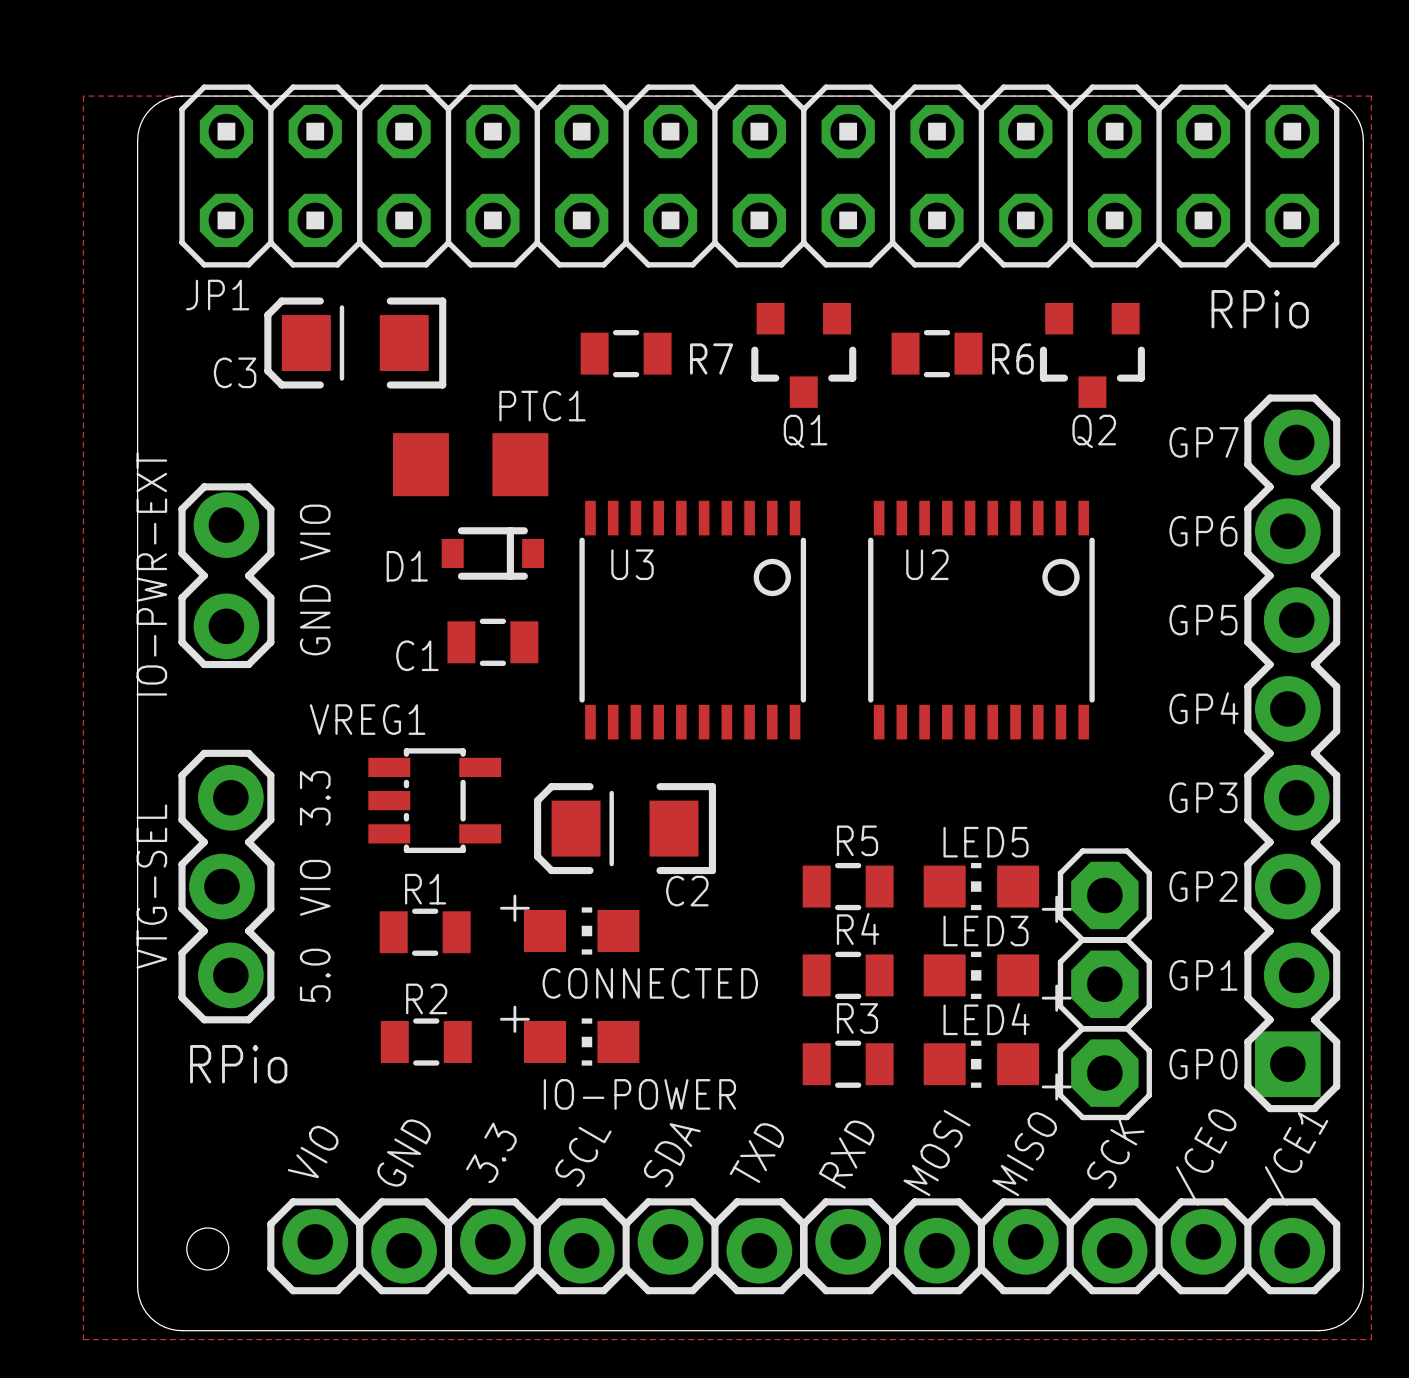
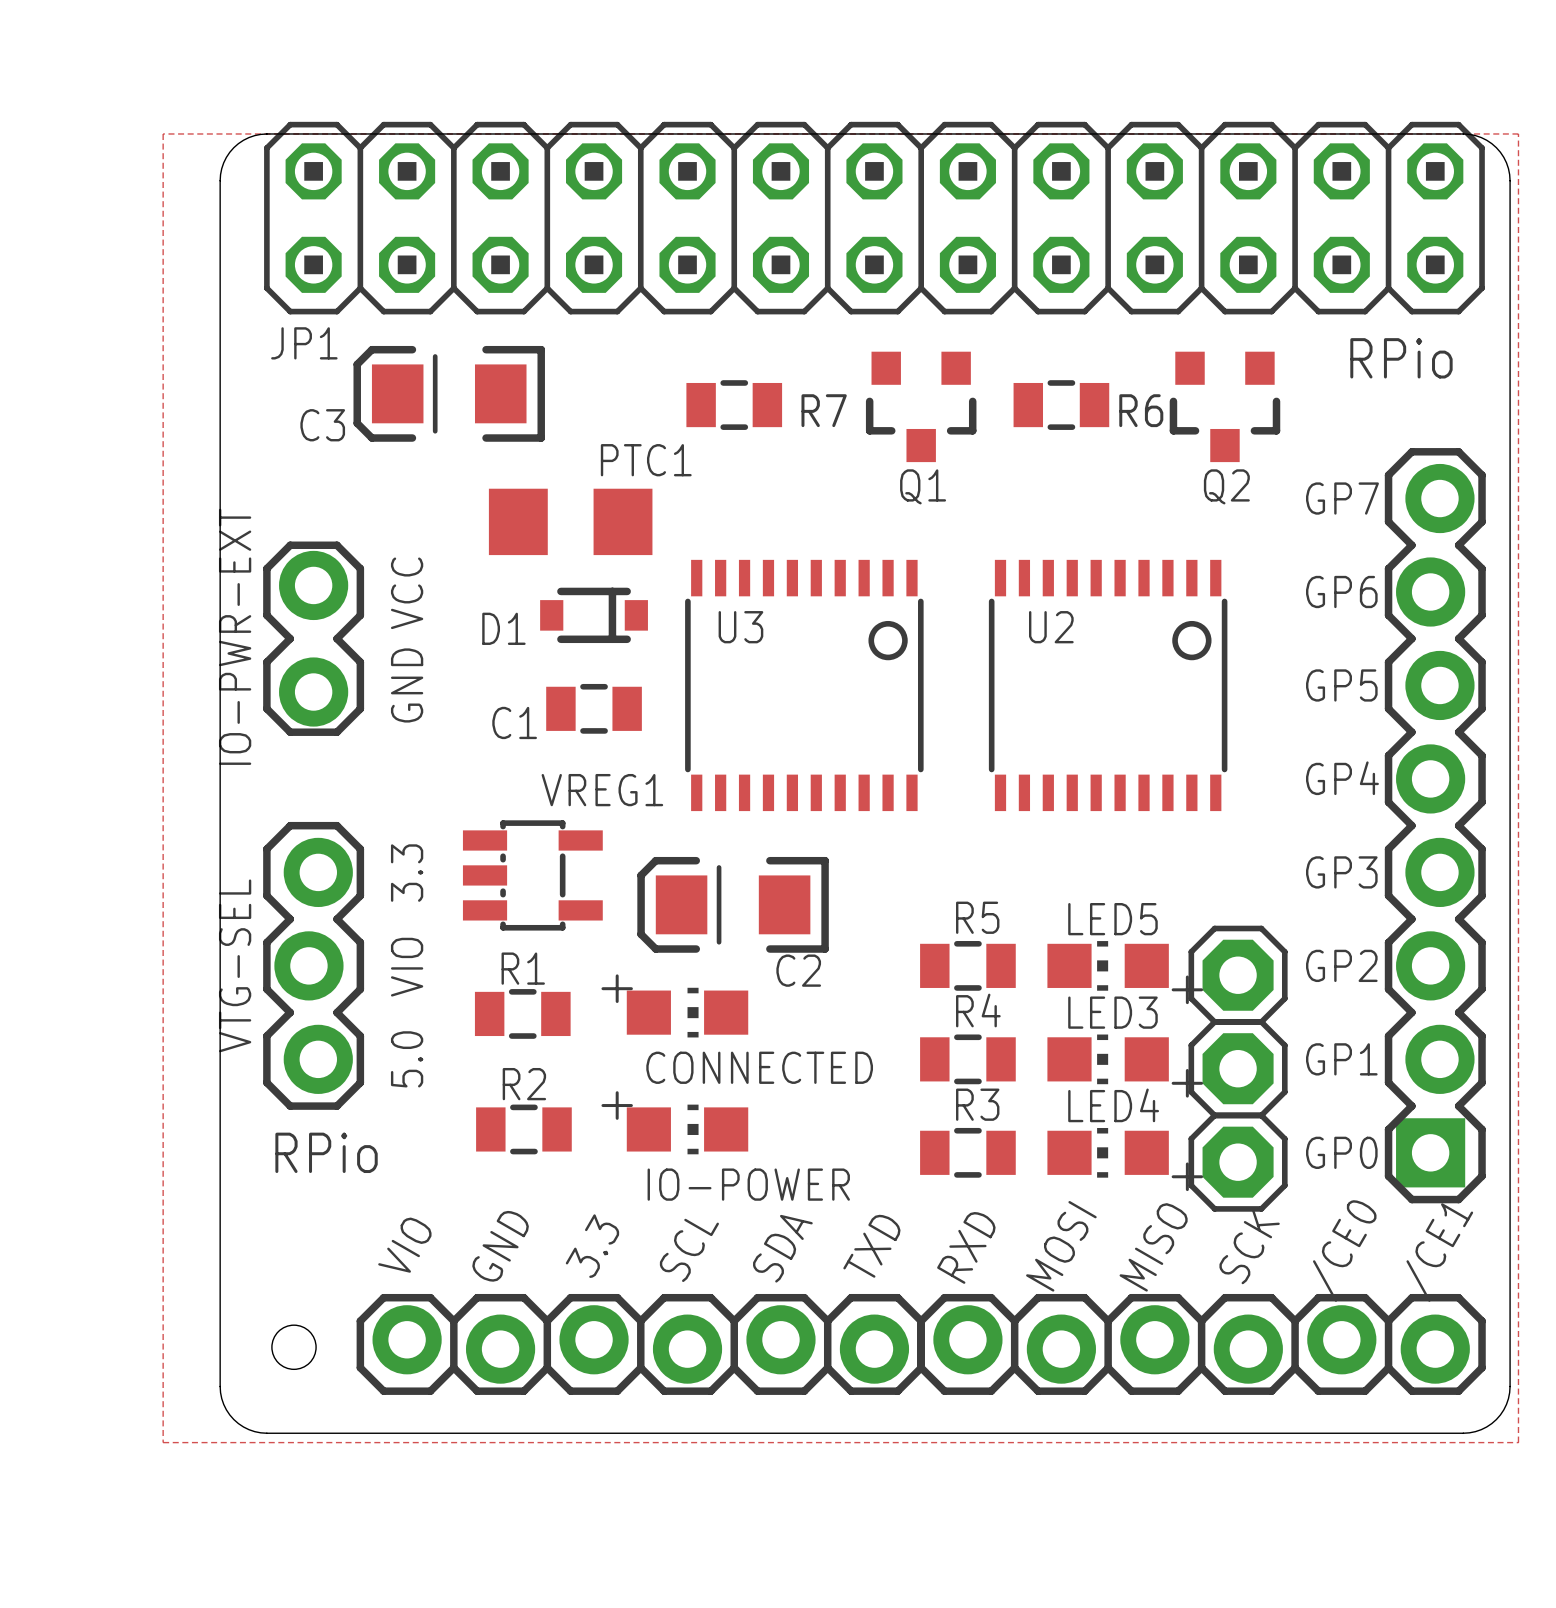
text: VIO (315, 532) -> VCC (407, 593)
VREG1 name position: VREG1 (367, 719) -> VREG1 (602, 790)

